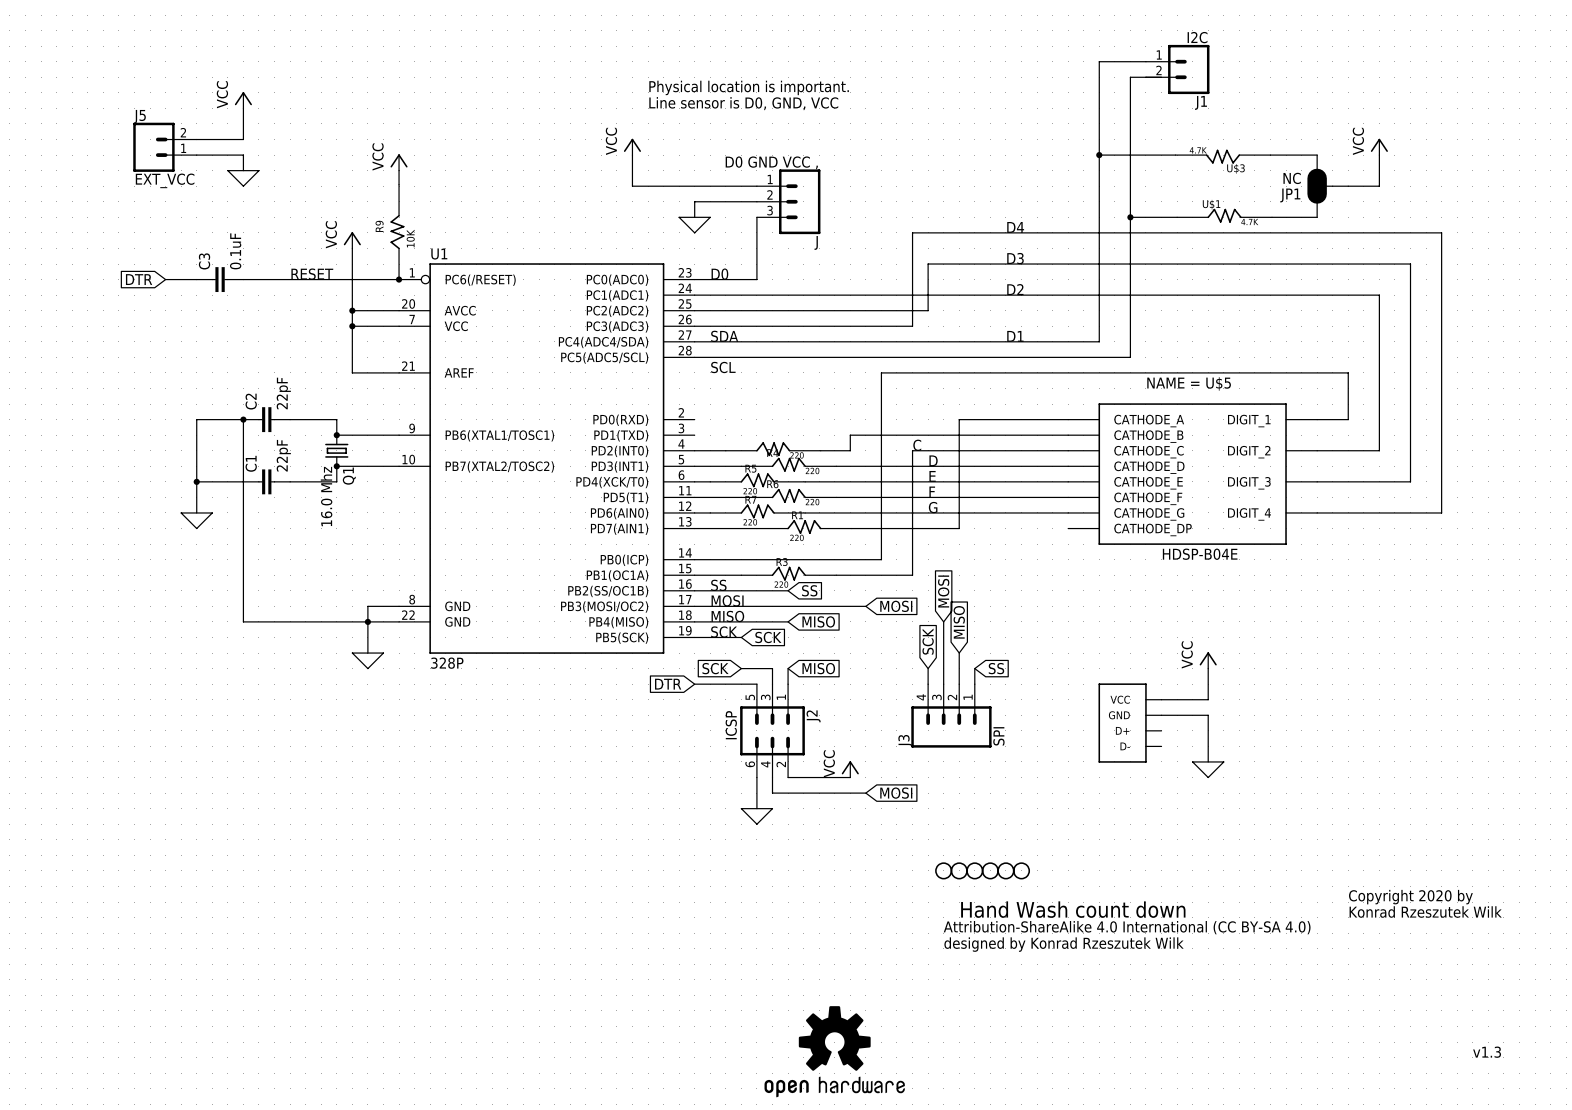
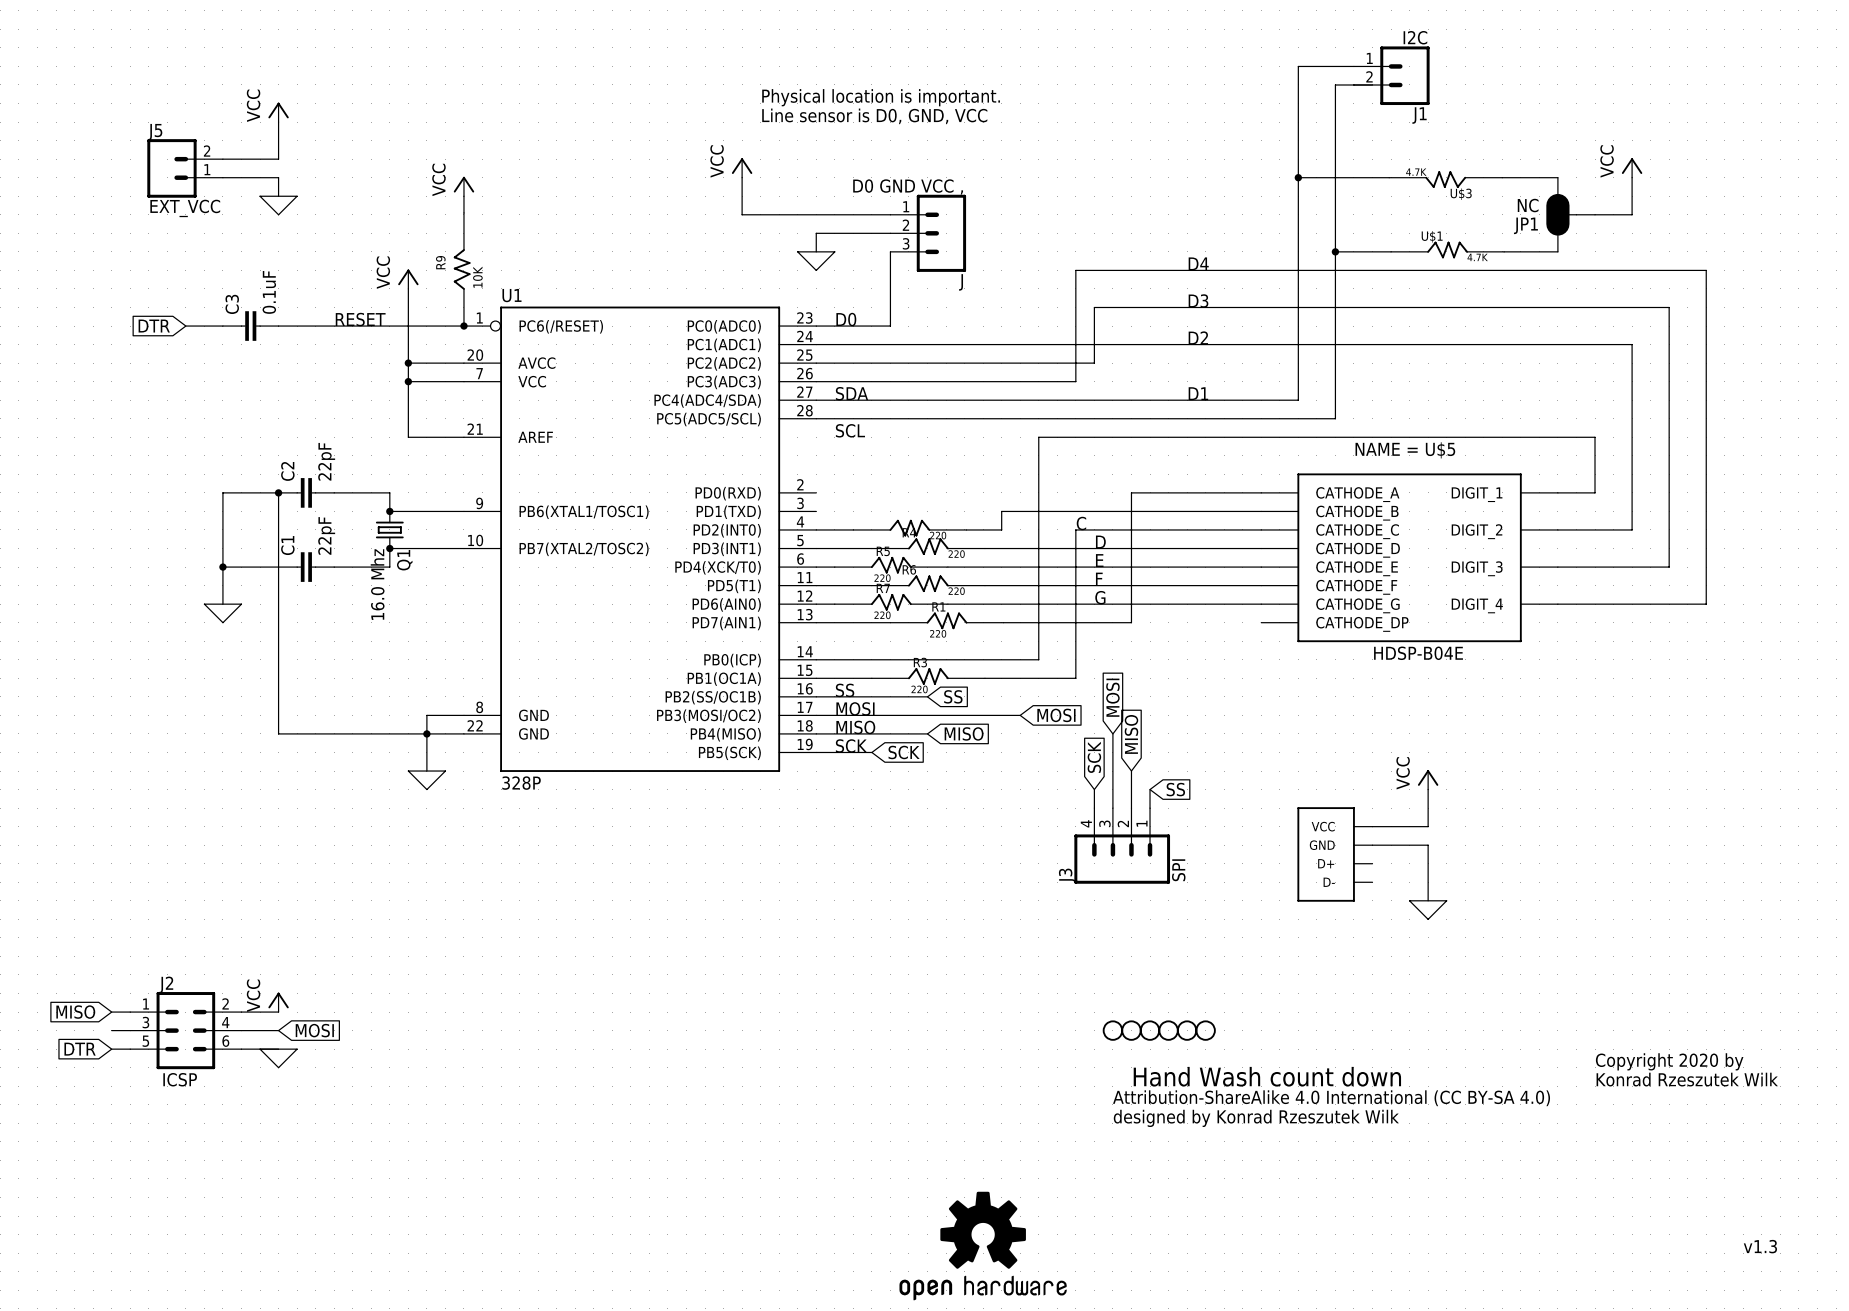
global label: SCK (715, 668) -> none
wire: (741, 668) (772, 668) (772, 684) -> none
wire: (788, 668) (788, 684) -> none
global label: MISO (818, 668) -> none
global label: DTR (668, 684) -> none
wire: (694, 684) (756, 684) -> none
J2 rotation: 0° (772, 730) -> 90° counterclockwise (185, 1030)
J2 position: (772, 730) -> (185, 1030)
power symbol: VCC (850, 769) -> none
wire: (756, 777) (756, 808) -> none
wire: (772, 777) (772, 793) (865, 793) -> none
wire: (788, 777) (850, 777) -> none
global label: MOSI (896, 793) -> none
power symbol: (756, 816) -> none
power symbol: none -> VCC (278, 1002)
global label: none -> MISO (75, 1012)
wire: none -> (111, 1012) (130, 1012)
wire: none -> (241, 1012) (278, 1012)
wire: none -> (111, 1030) (130, 1030)
wire: none -> (241, 1030) (278, 1030)
global label: none -> MOSI (314, 1030)
global label: none -> DTR (80, 1049)
wire: none -> (111, 1049) (130, 1049)
wire: none -> (241, 1049) (278, 1049)
power symbol: none -> (278, 1058)

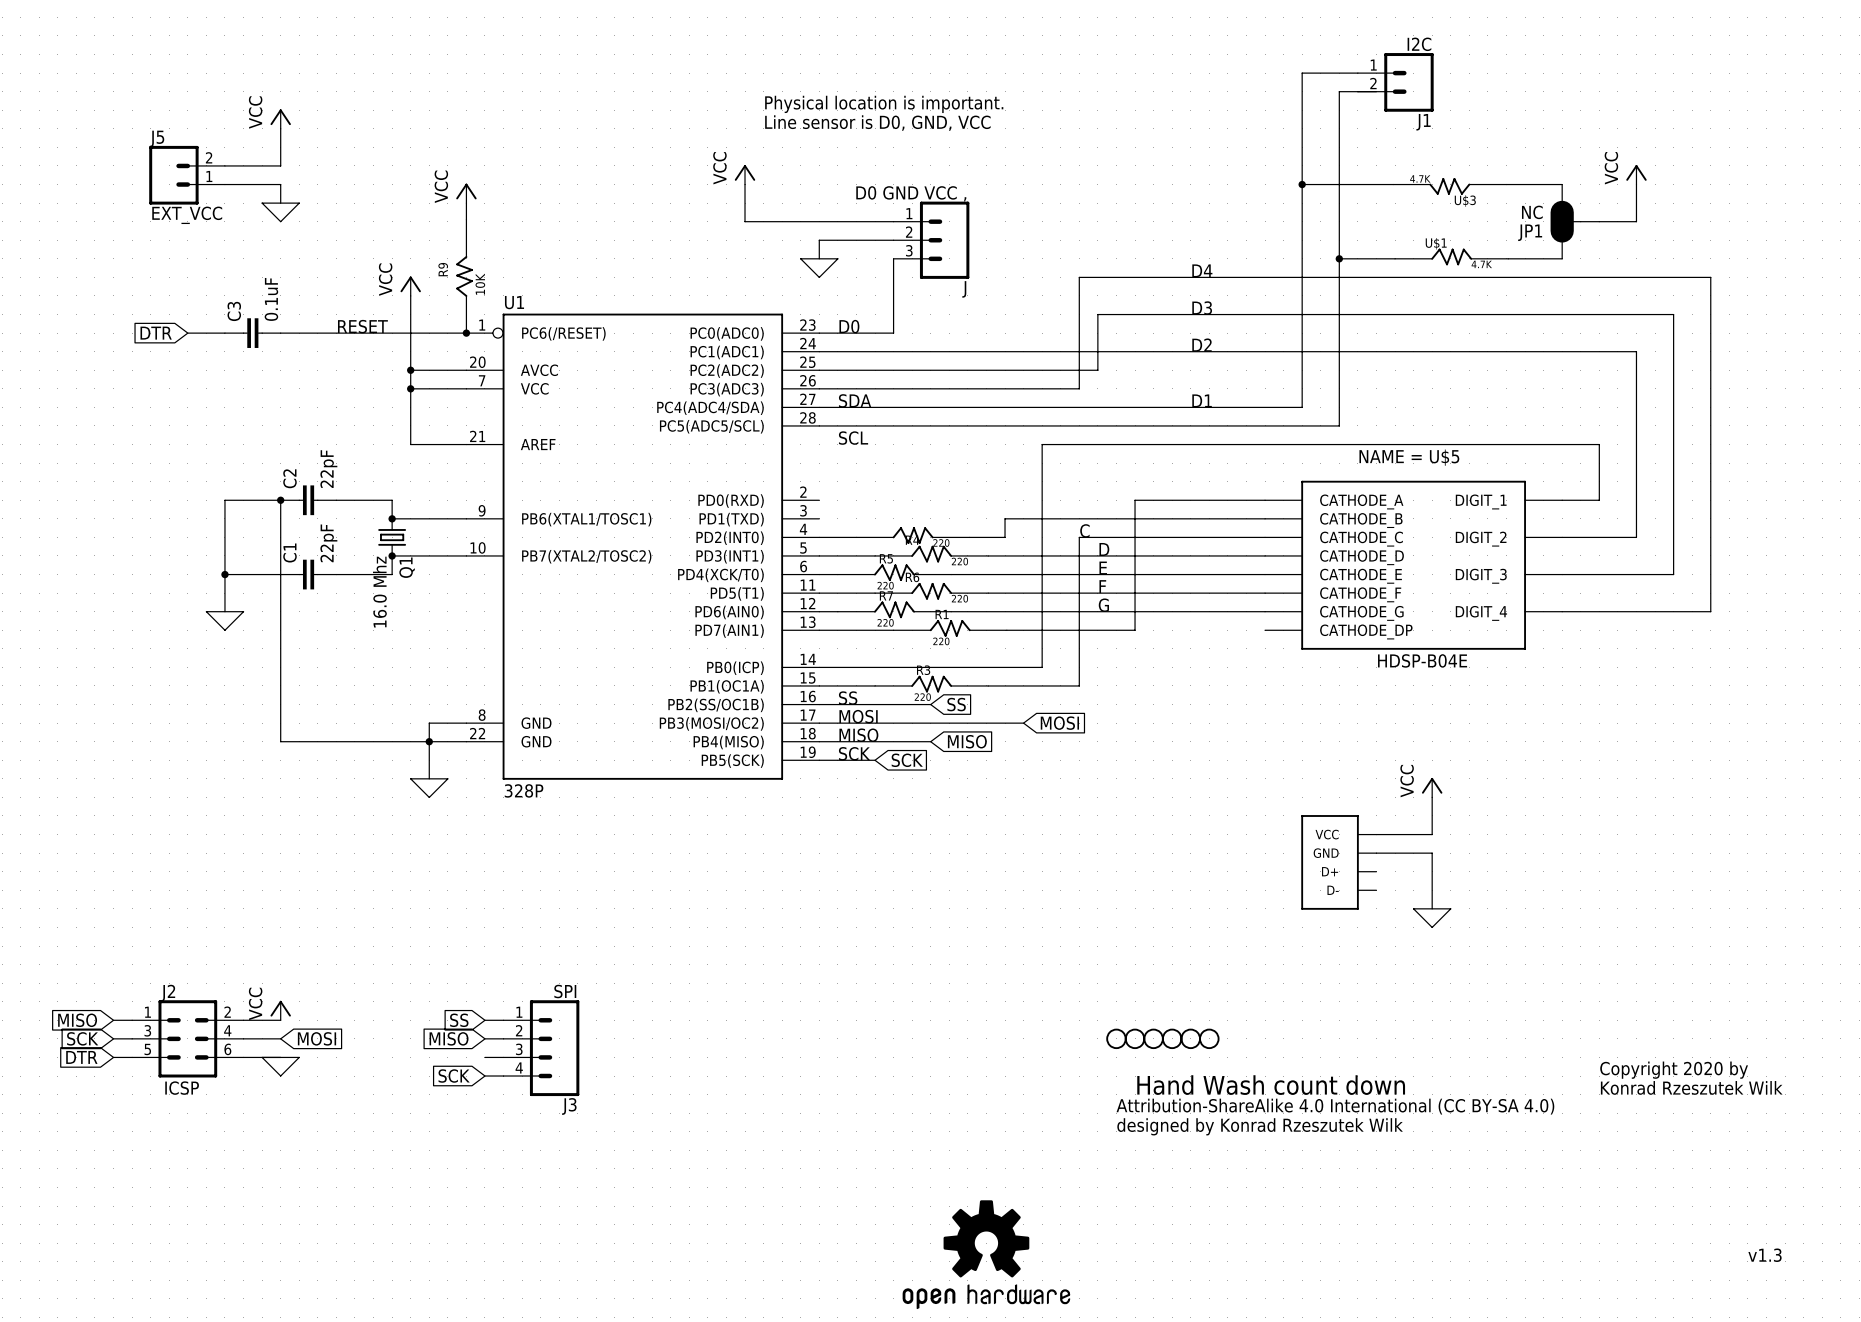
global label: MOSI (1112, 697) -> none
wire: (1112, 733) (1112, 808) -> none
global label: MISO (1131, 734) -> none
global label: SCK (1094, 757) -> none
wire: (1131, 771) (1131, 808) -> none
wire: (1094, 789) (1094, 808) -> none
wire: (1150, 789) (1150, 808) -> none
global label: SS (1175, 789) -> none
J3 position: (1122, 845) -> (541, 1048)
J3 rotation: 0° (1122, 859) -> 90° counterclockwise (554, 1048)
global label: none -> SS (459, 1020)
wire: none -> (484, 1020) (503, 1020)
global label: none -> SCK (82, 1038)
global label: none -> MISO (449, 1038)
wire: none -> (484, 1038) (503, 1038)
wire: none -> (484, 1057) (503, 1057)
global label: none -> SCK (454, 1076)
wire: none -> (484, 1076) (503, 1076)

